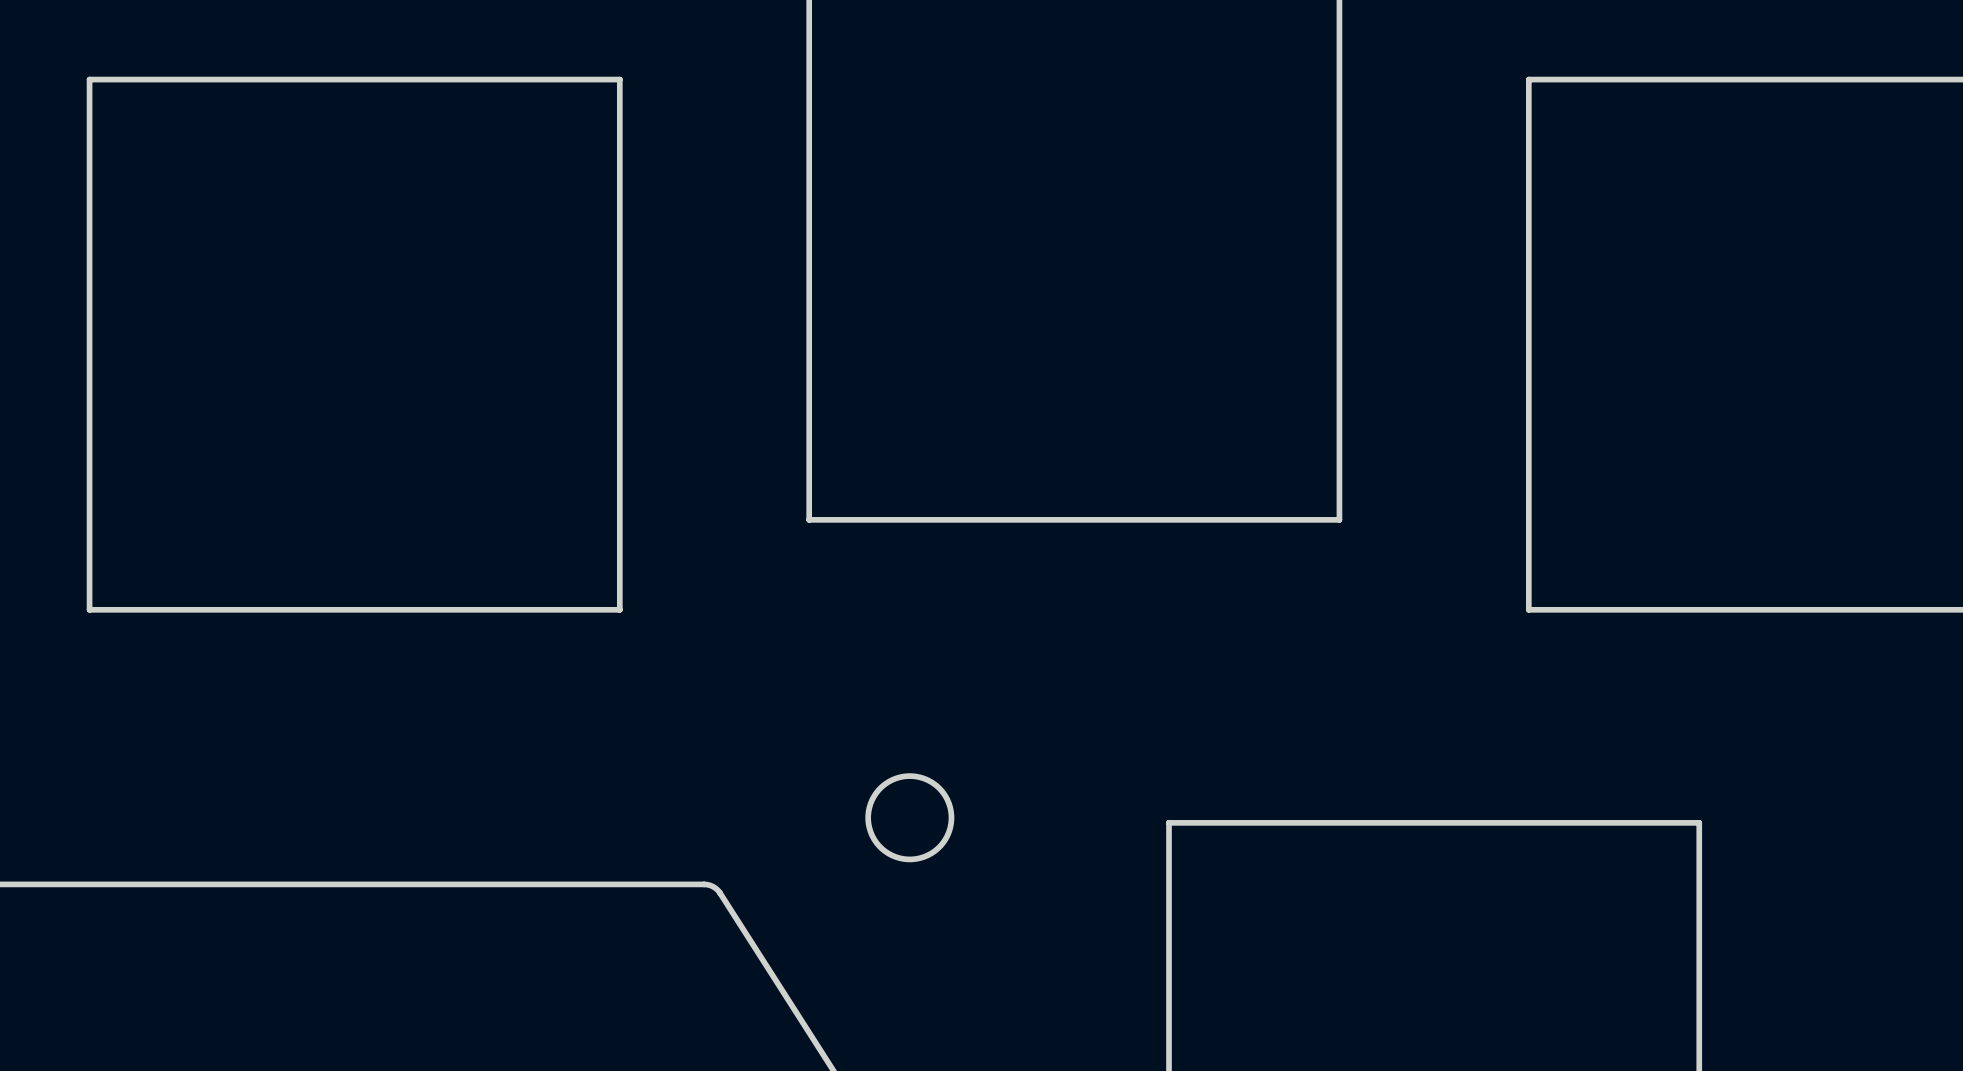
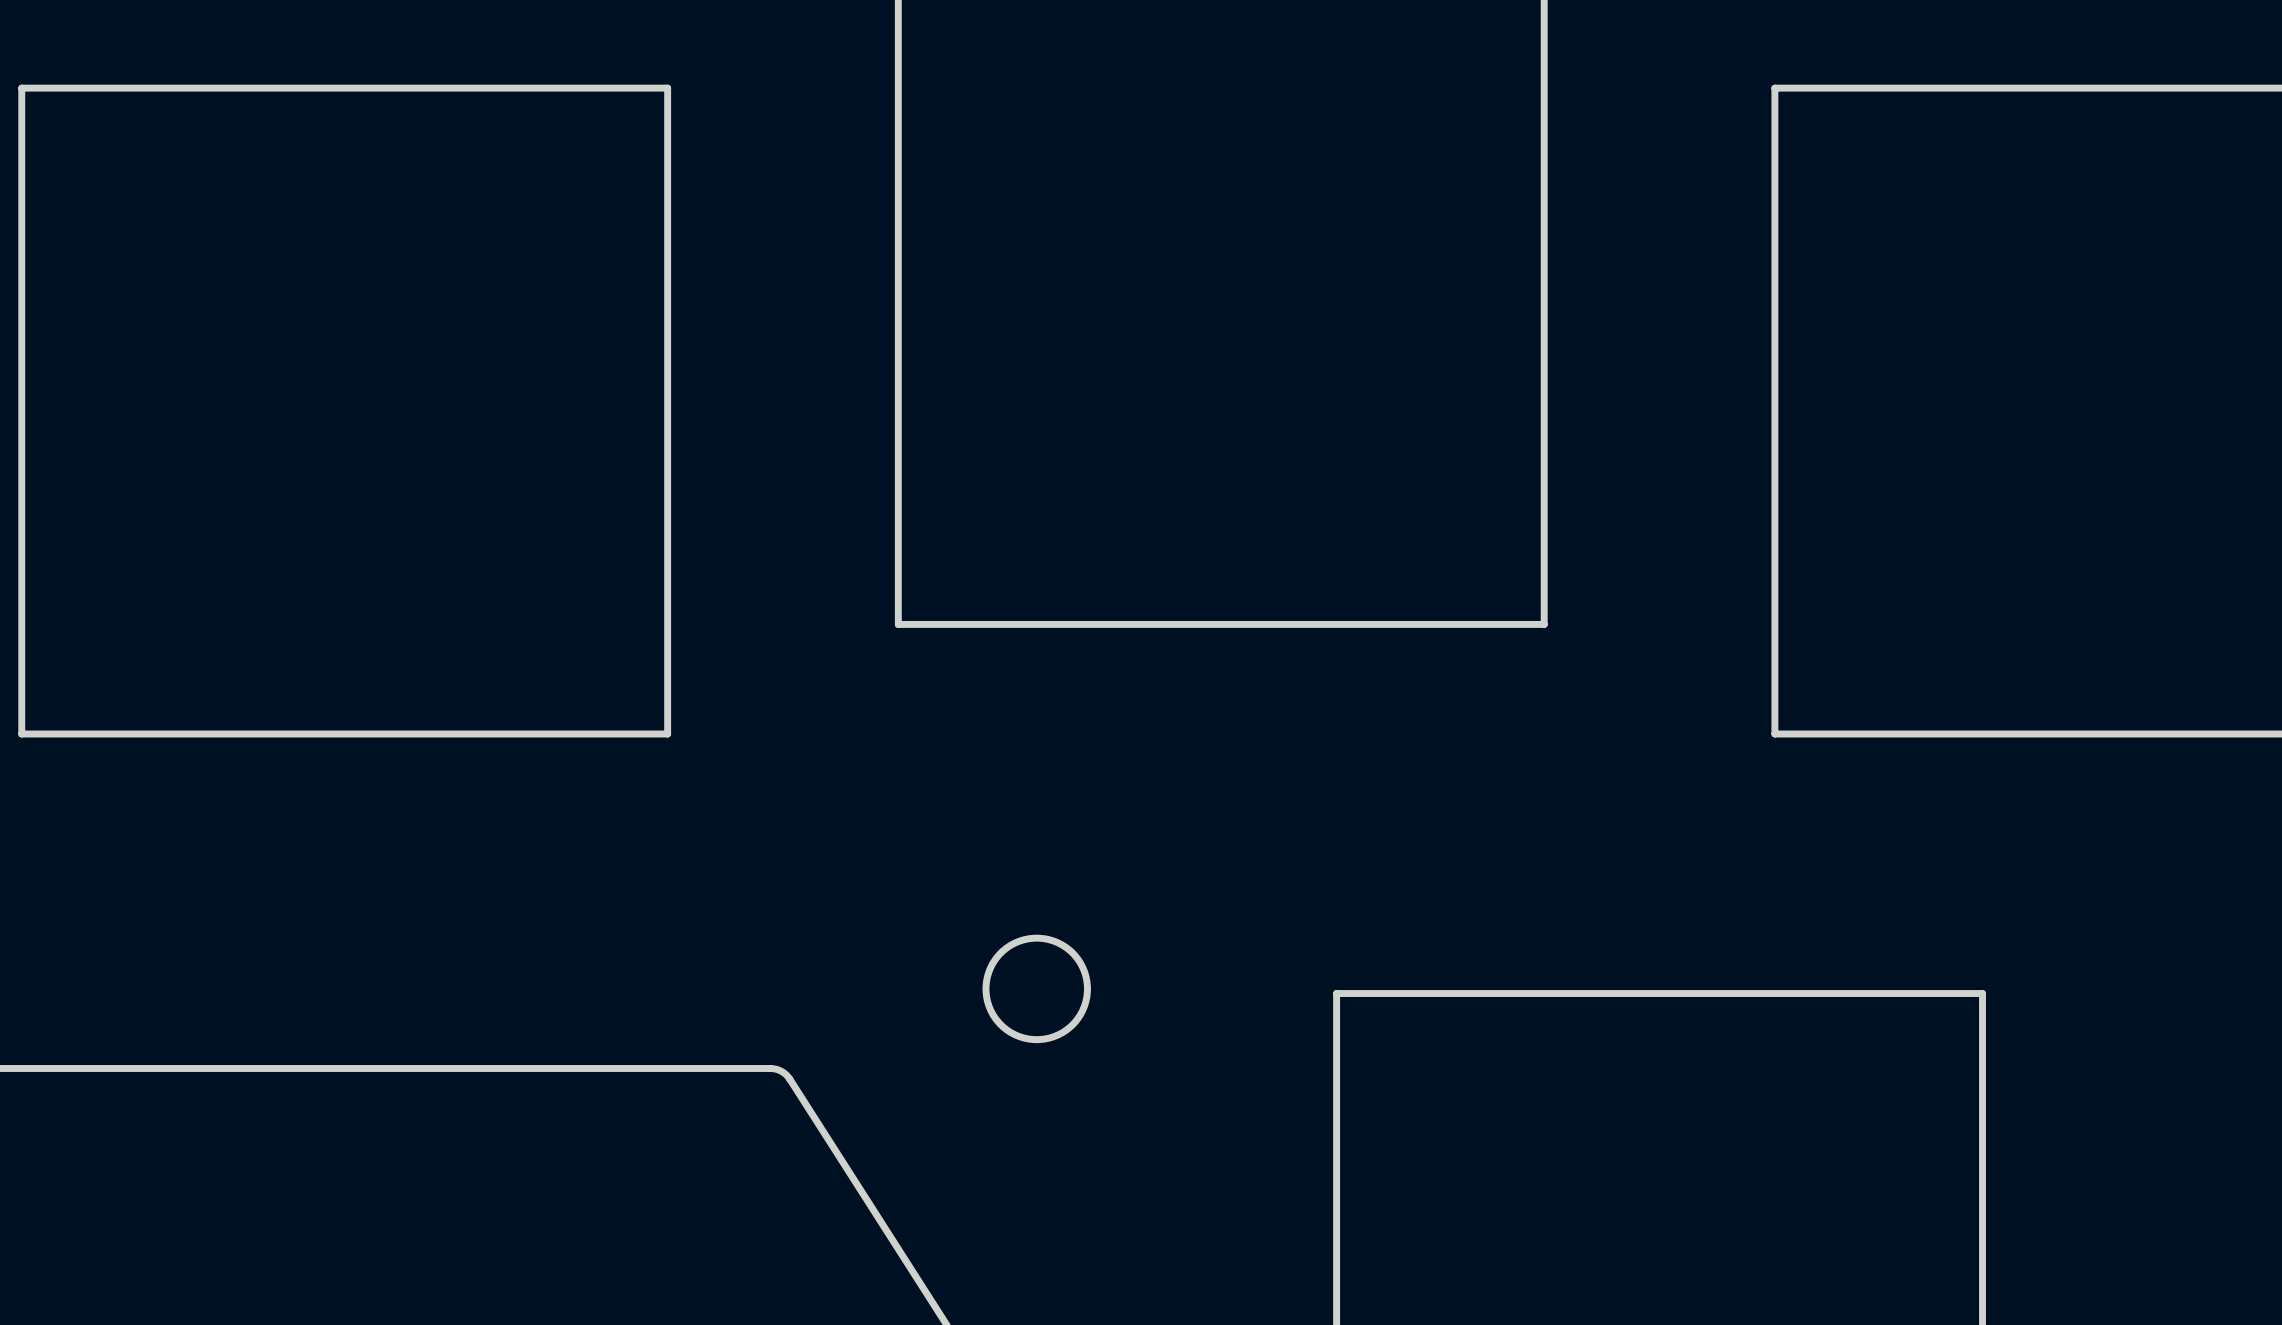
round board edge position: (909, 817) -> (1036, 988)

